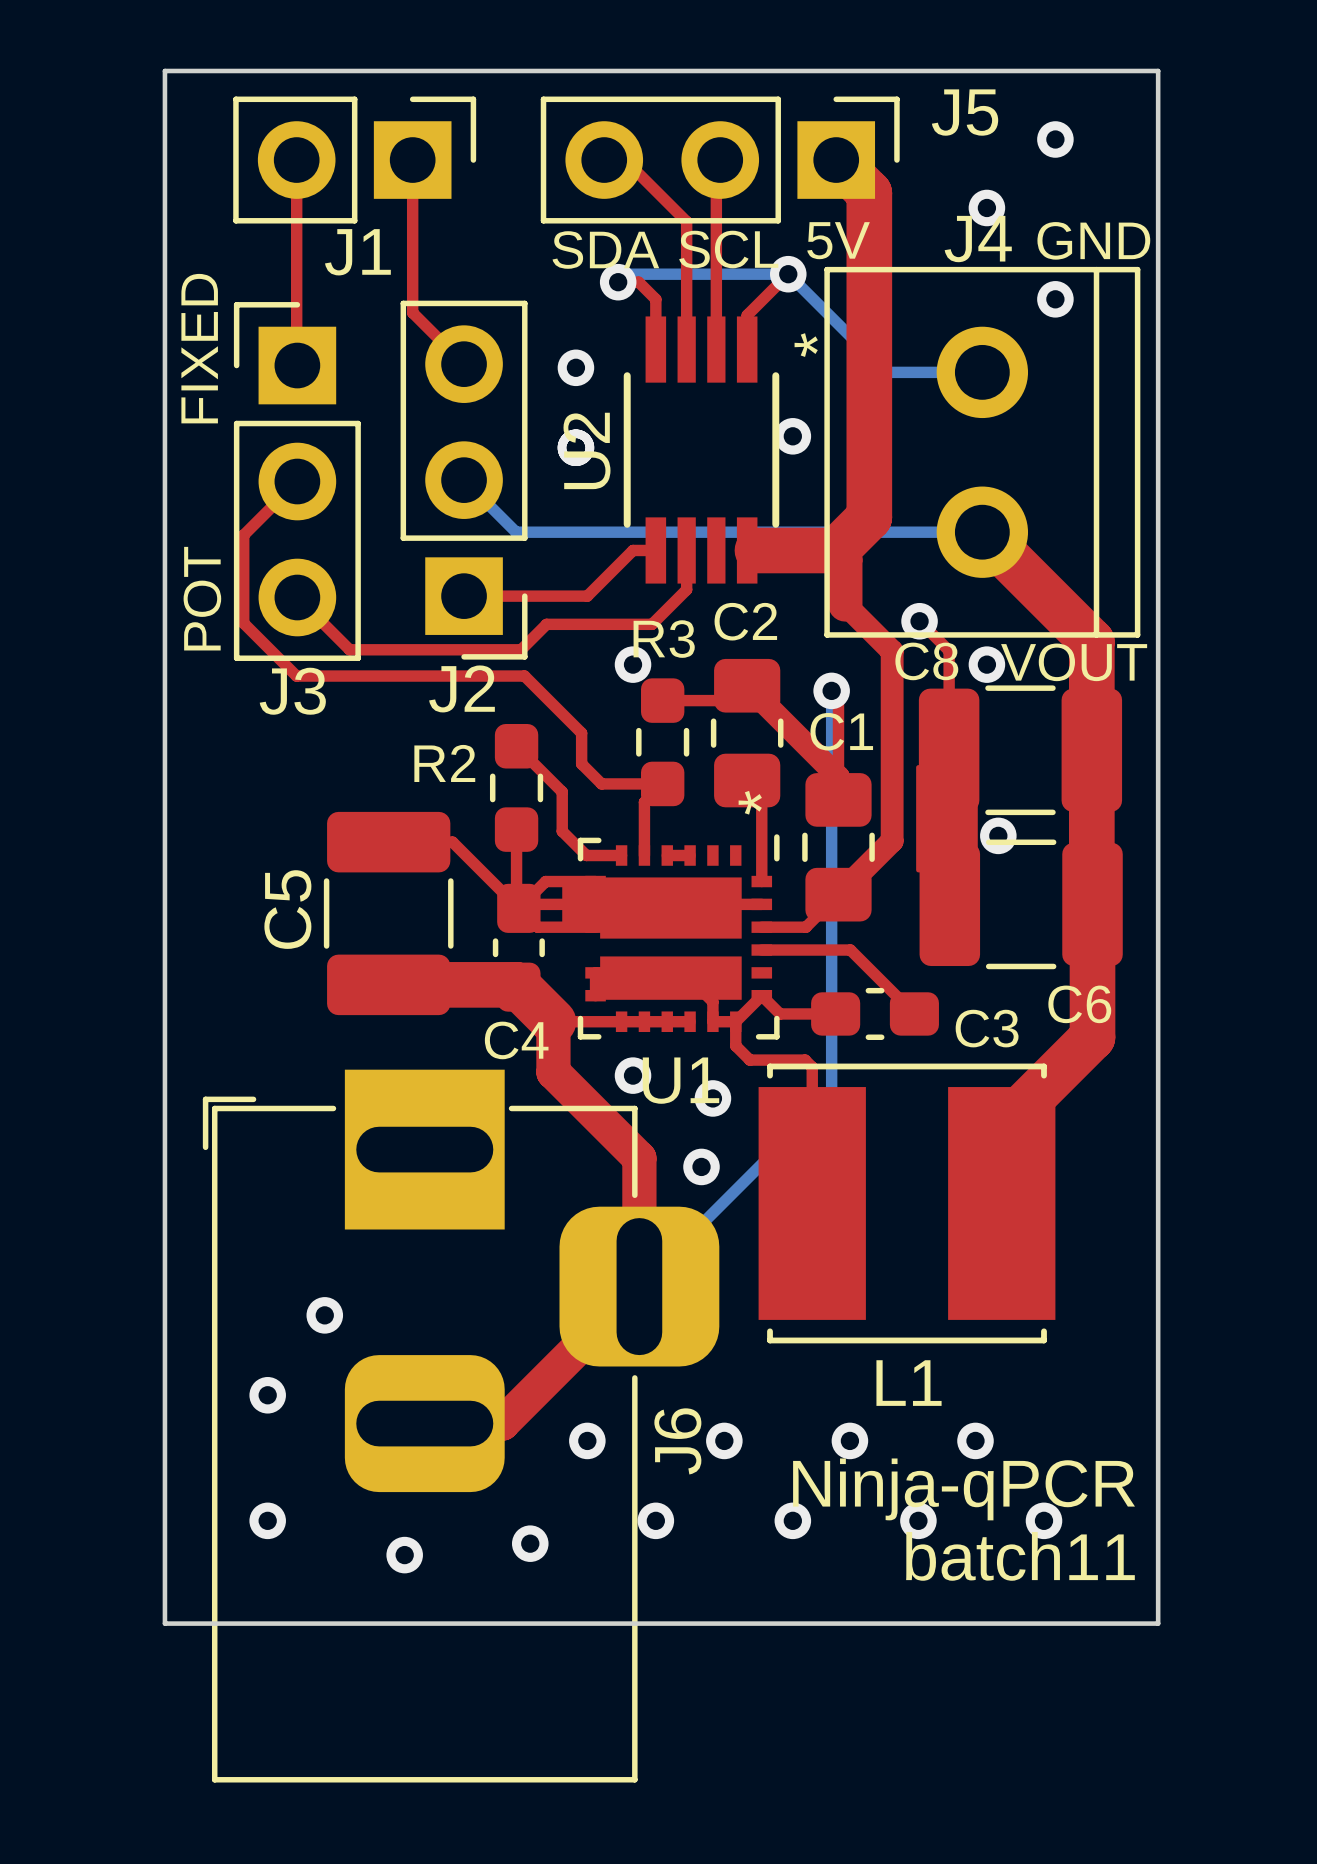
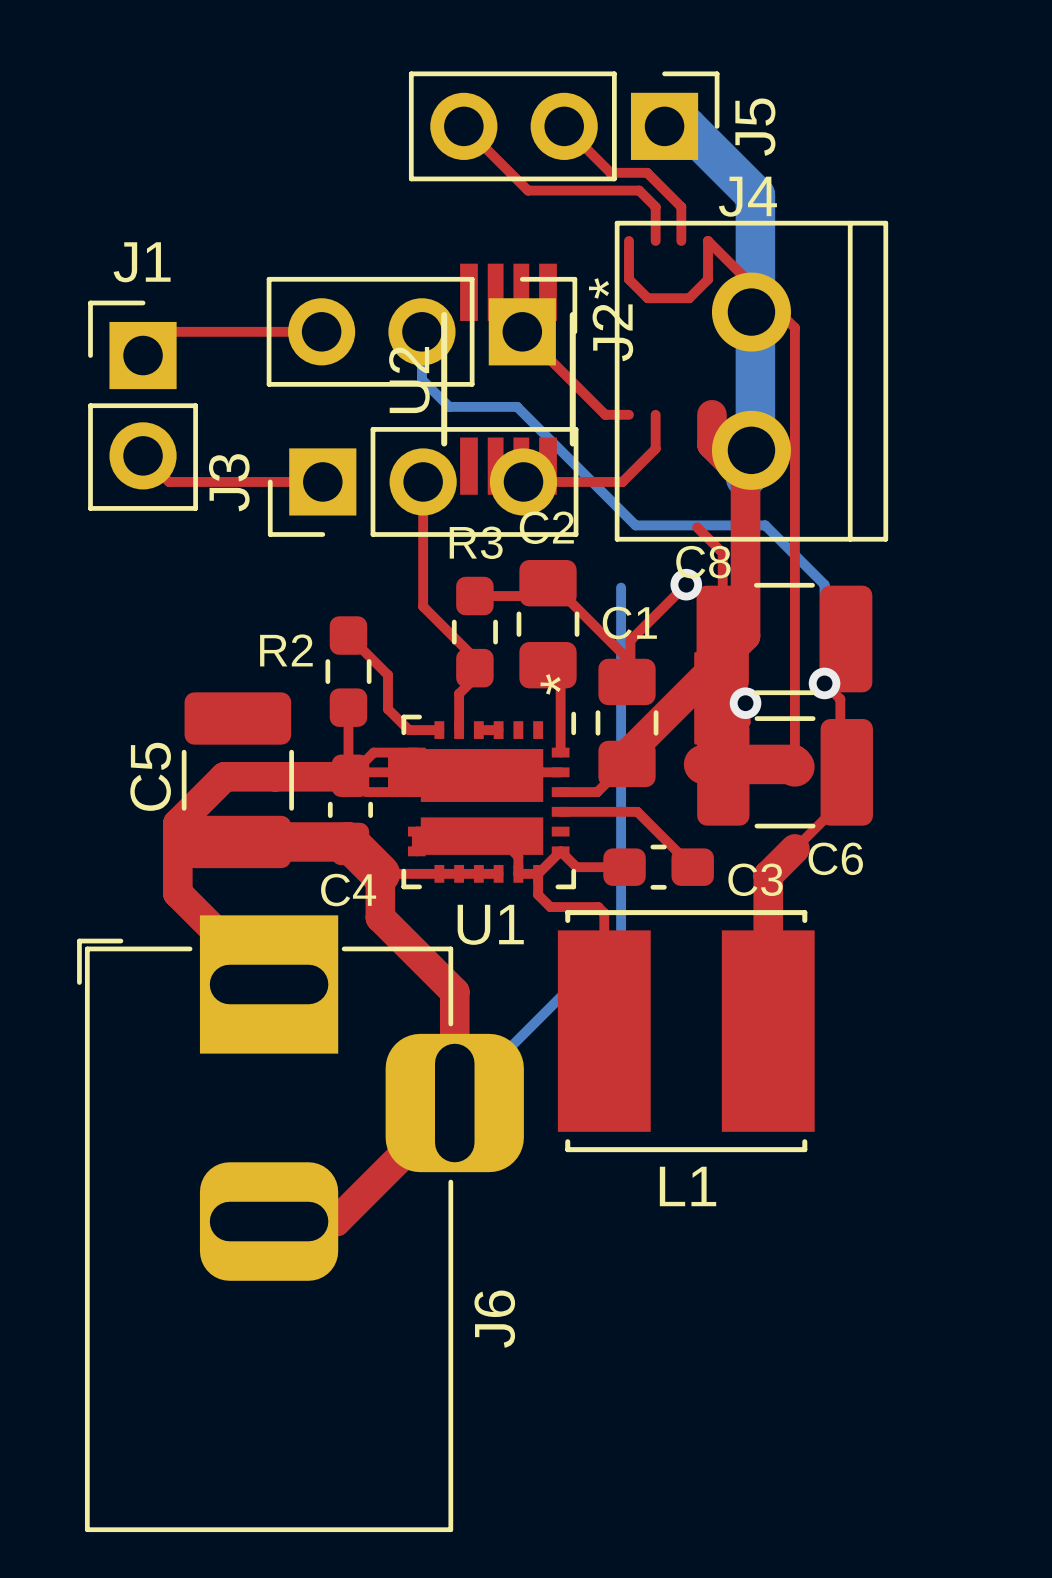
board edge: (164, 70) (164, 1623) (1158, 1623) (1158, 70) (164, 70) -> none
J5 name rotation: 0° (965, 112) -> 90° counterclockwise (755, 127)
via: (1055, 139) -> none
top track: none -> (463, 126) (528, 190) (639, 190) (655, 206) (655, 240)
top track: none -> (564, 126) (610, 172) (647, 172) (681, 206) (681, 240)
bottom track: none -> (664, 126) (686, 126) (755, 195) (755, 468) (745, 478)
top track: (296, 160) (297, 365) -> none
J1 rotation: 0° (354, 160) -> 90° counterclockwise (143, 405)
J1 position: (354, 160) -> (143, 405)
top track: (412, 160) (412, 312) (464, 364) -> none
top track: (604, 160) (625, 160) (686, 221) (686, 349) -> none
top track: (720, 160) (716, 163) (716, 349) -> none
J5 position: (720, 160) -> (564, 126)
top track: (836, 160) (869, 193) (869, 517) (836, 550) -> none
via: (986, 207) -> none
text: 5V (838, 240) -> none
text: GND (1093, 240) -> none
text: SDA (605, 249) -> none
text: SCL (728, 249) -> none
J1 name position: J1 (357, 252) -> J1 (142, 262)
top track: (788, 274) (747, 315) (747, 349) -> none
via: (788, 274) -> none
top track: (618, 282) (638, 282) (655, 299) (655, 349) -> none
bottom track: (618, 282) (626, 274) (788, 274) (886, 372) (982, 372) -> none
via: (618, 282) -> none
top track: none -> (628, 240) (628, 279) (647, 298) (689, 298) (708, 279) (708, 240) (794, 327) (794, 766) (792, 764) (703, 764) (745, 722) (745, 703)
via: (1055, 299) -> none
text: FIXED (199, 348) -> none
via: (575, 367) -> none
top track: none -> (321, 331) (166, 331) (143, 355)
bottom track: none -> (421, 331) (421, 379) (449, 406) (517, 406) (635, 525) (765, 525) (824, 584) (824, 683)
top track: none -> (522, 331) (605, 414) (628, 414)
via: (792, 436) -> none
via: (575, 447) -> none
bottom track: (464, 480) (516, 532) (982, 532) -> none
J2 rotation: 0° (464, 480) -> 90° counterclockwise (421, 331)
top track: (297, 481) (243, 535) (243, 623) (296, 676) (524, 676) (581, 733) (581, 763) (601, 783) (662, 783) (644, 802) (644, 813) -> (423, 481) (423, 606) (484, 668) (459, 693)
J3 rotation: 0° (297, 481) -> 90° counterclockwise (423, 481)
J3 position: (297, 481) -> (423, 481)
top track: none -> (655, 414) (655, 448) (622, 481) (523, 481)
top track: (982, 532) (1091, 641) (1092, 1037) (1001, 1128) -> (824, 683) (840, 699) (840, 803) (768, 875) (768, 965)
top track: none -> (143, 455) (169, 481) (322, 481)
top track: (655, 550) (633, 550) (587, 596) (464, 596) -> none
top track: (686, 550) (686, 589) (652, 624) (546, 624) (521, 649) (349, 649) (297, 597) -> none
top track: (757, 550) (836, 550) -> none
top track: (836, 550) (845, 559) (845, 604) (892, 651) (892, 841) (804, 927) -> (711, 414) (711, 444) (745, 478) (745, 636) (621, 759) (621, 767) (597, 792)
text: POT (202, 598) -> none
via: (919, 621) -> none
text: VOUT (1074, 662) -> none
via: (633, 664) -> none
via: (986, 664) -> none
via: none -> (686, 584)
top track: (831, 690) (838, 697) (838, 799) (838, 777) (747, 685) (732, 700) -> (686, 584) (630, 640) (630, 661) (564, 596) (535, 596)
via: (831, 690) -> none
J3 name position: J3 (292, 691) -> J3 (229, 482)
via: none -> (824, 683)
via position: (998, 835) -> (745, 703)
top track: (388, 842) (452, 842) (516, 906) -> none
top track: none -> (350, 775) (224, 776) (177, 823) (177, 893) (269, 984)
via: (633, 1075) -> none
via: (712, 1098) -> none
via: (701, 1166) -> none
via: (324, 1315) -> none
via: (267, 1395) -> none
via: (587, 1440) -> none
via: (724, 1440) -> none
via: (849, 1440) -> none
via: (975, 1440) -> none
J6 name position: J6 (677, 1441) -> J6 (494, 1319)
text: Ninja-qPCR (964, 1489) -> none
via: (267, 1520) -> none
via: (655, 1520) -> none
via: (792, 1520) -> none
via: (918, 1520) -> none
via: (1043, 1520) -> none
via: (530, 1543) -> none
via: (404, 1555) -> none
text: batch11 (1020, 1556) -> none

